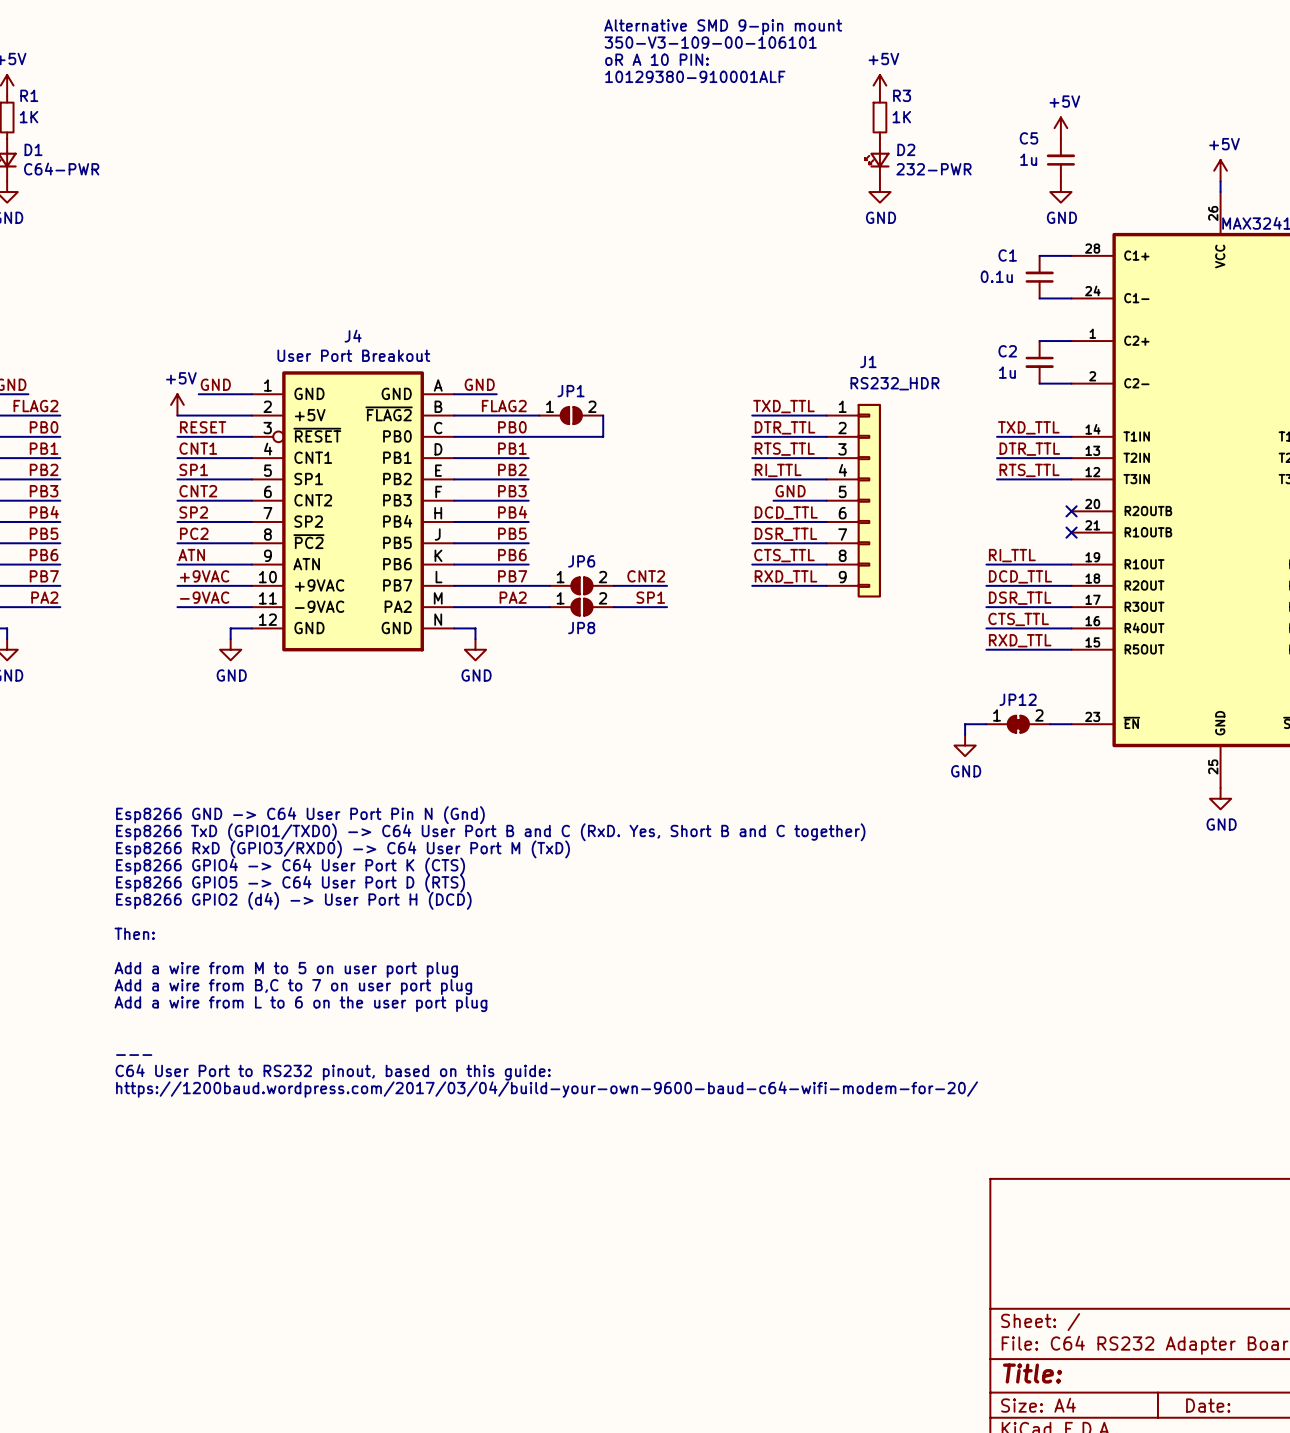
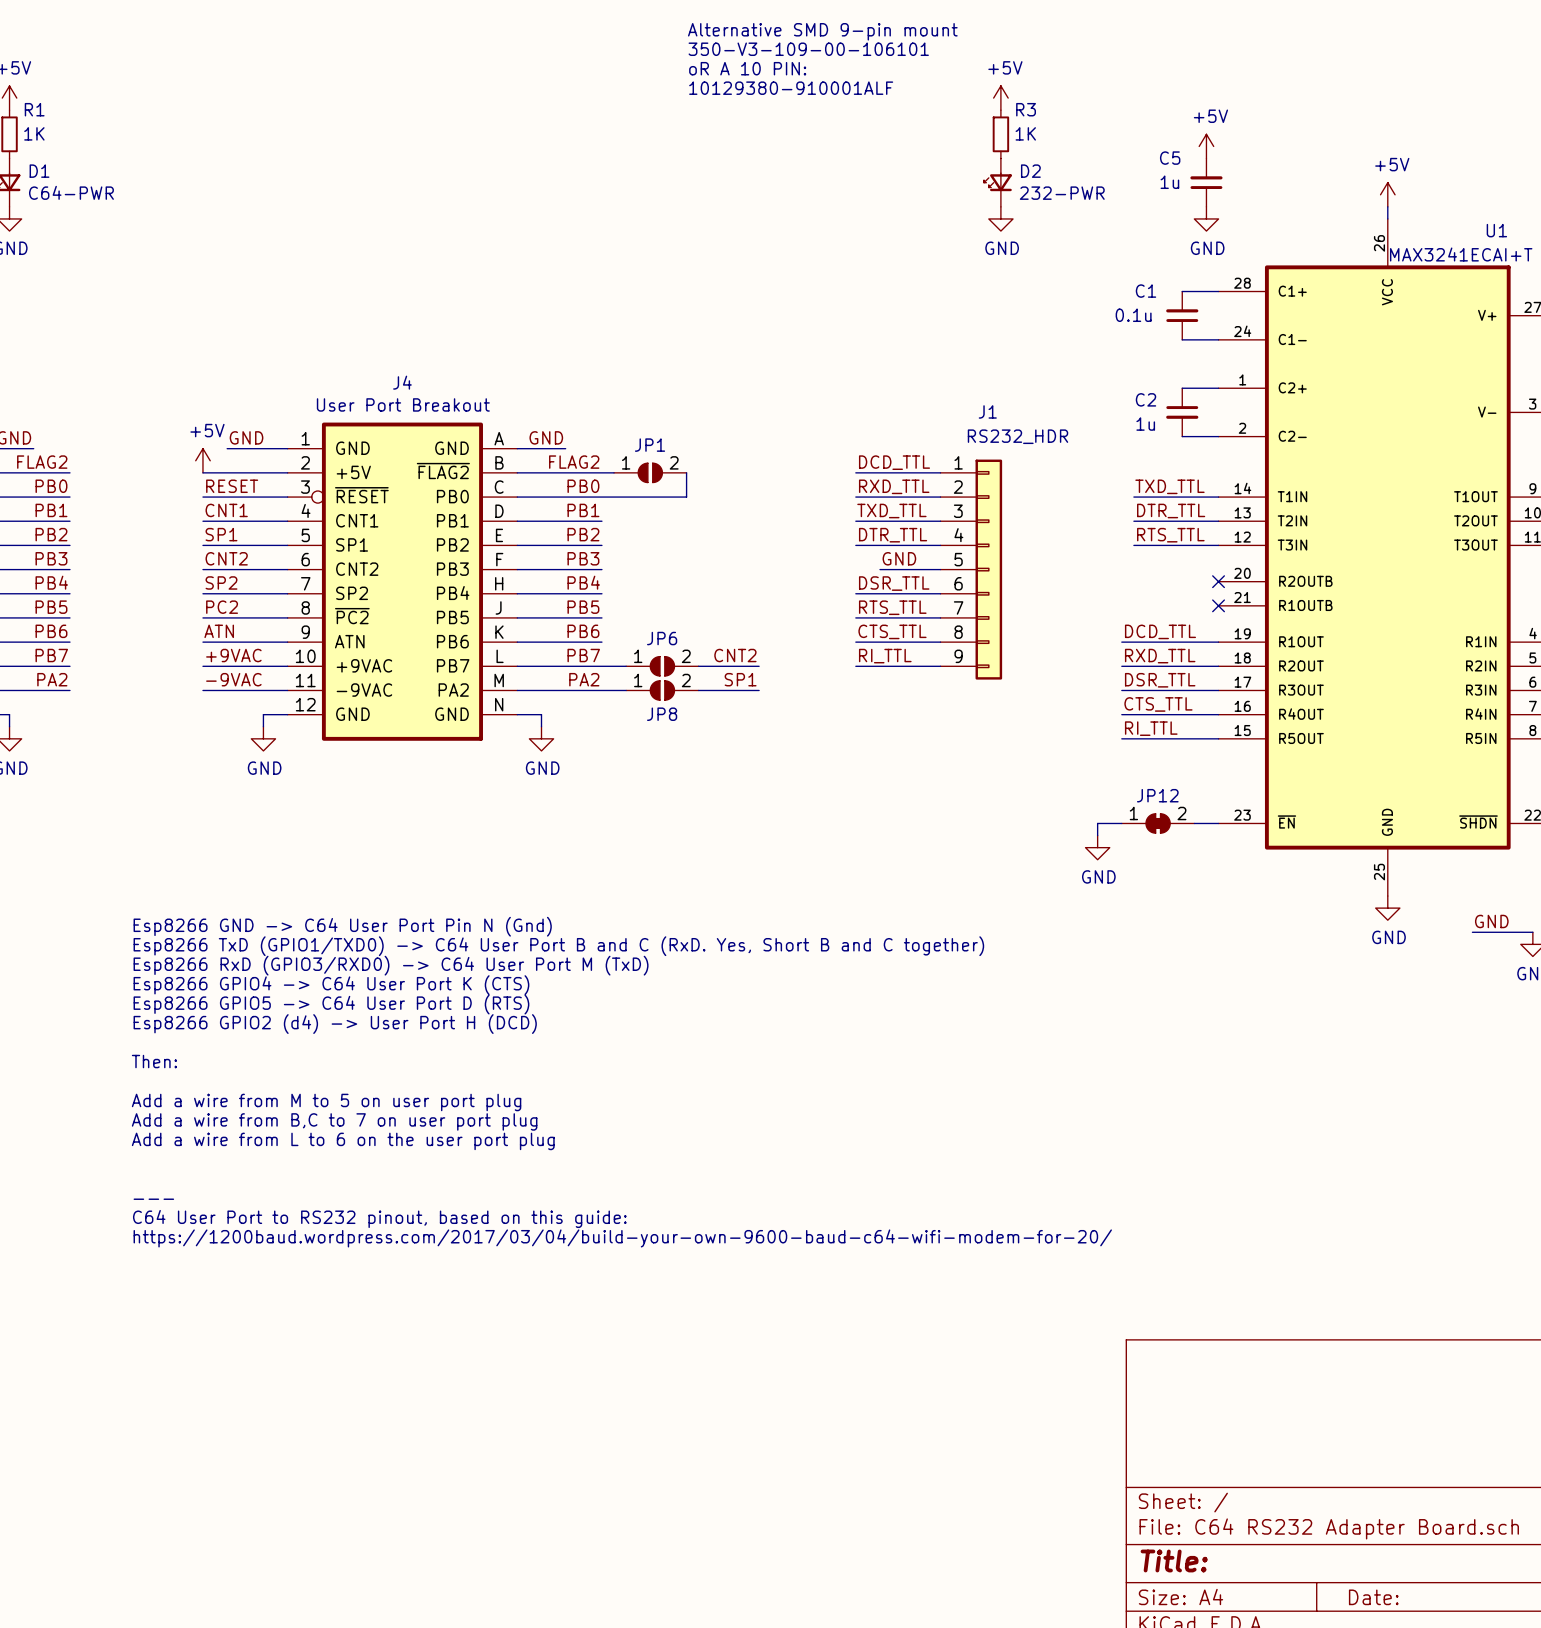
label: TXD_TTL (783, 406) -> DCD_TTL (894, 462)
label: DTR_TTL (785, 427) -> RXD_TTL (894, 486)
label: RTS_TTL (784, 449) -> TXD_TTL (891, 511)
label: RI_TTL (778, 470) -> DTR_TTL (893, 535)
label: DCD_TTL (786, 513) -> DSR_TTL (894, 583)
label: DSR_TTL (786, 534) -> RTS_TTL (892, 607)
label: RI_TTL (1012, 555) -> DCD_TTL (1160, 631)
label: RXD_TTL (786, 576) -> RI_TTL (885, 656)
label: DCD_TTL (1020, 576) -> RXD_TTL (1160, 656)
label: RXD_TTL (1020, 640) -> RI_TTL (1151, 728)

